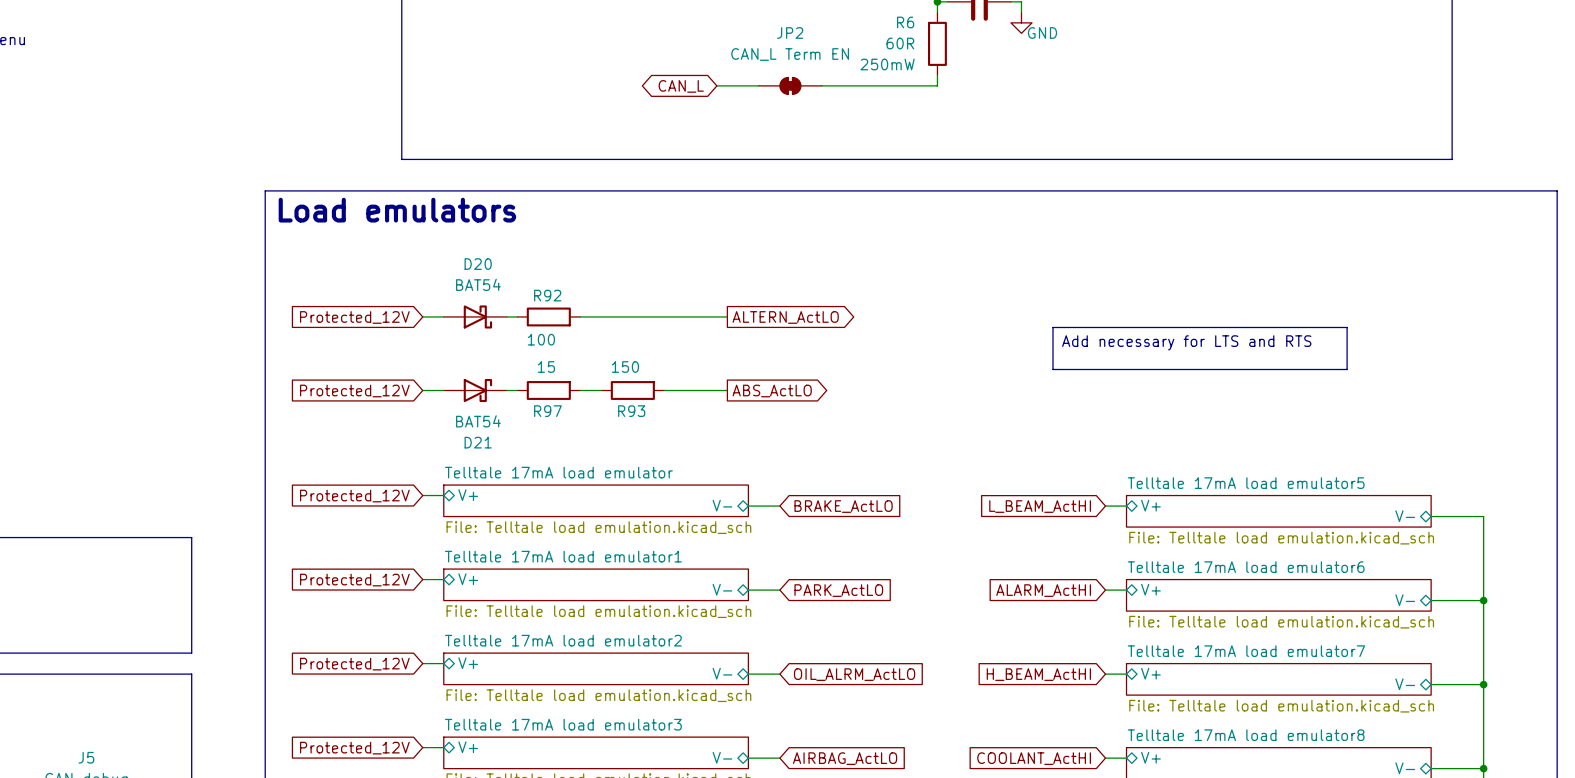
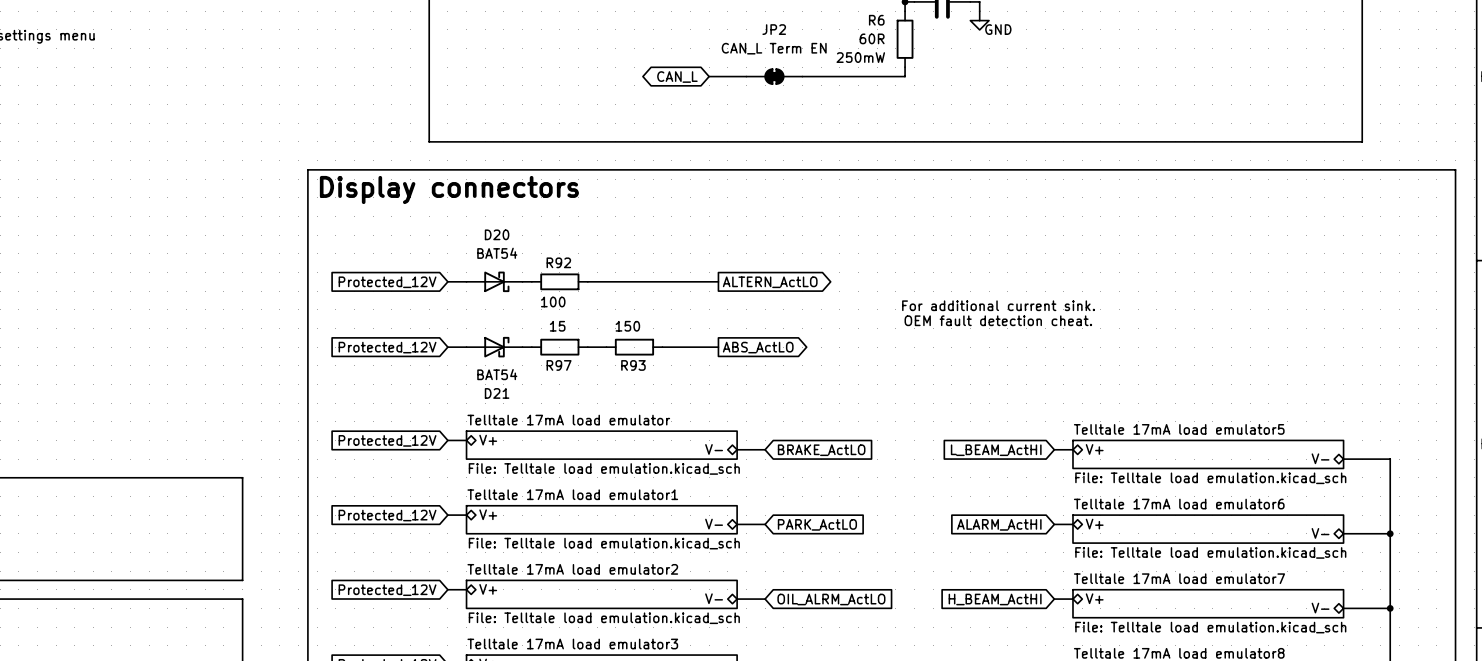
text: Load emulators (397, 210) -> Display connectors (449, 189)
line: (1052, 327) (1347, 327) (1347, 369) (1052, 369) (1052, 327) -> none
text: Add necessary for LTS and RTS (1186, 342) -> none
text: none -> For additional current sink. (998, 305)
text: none -> OEM fault detection cheat. (998, 320)

